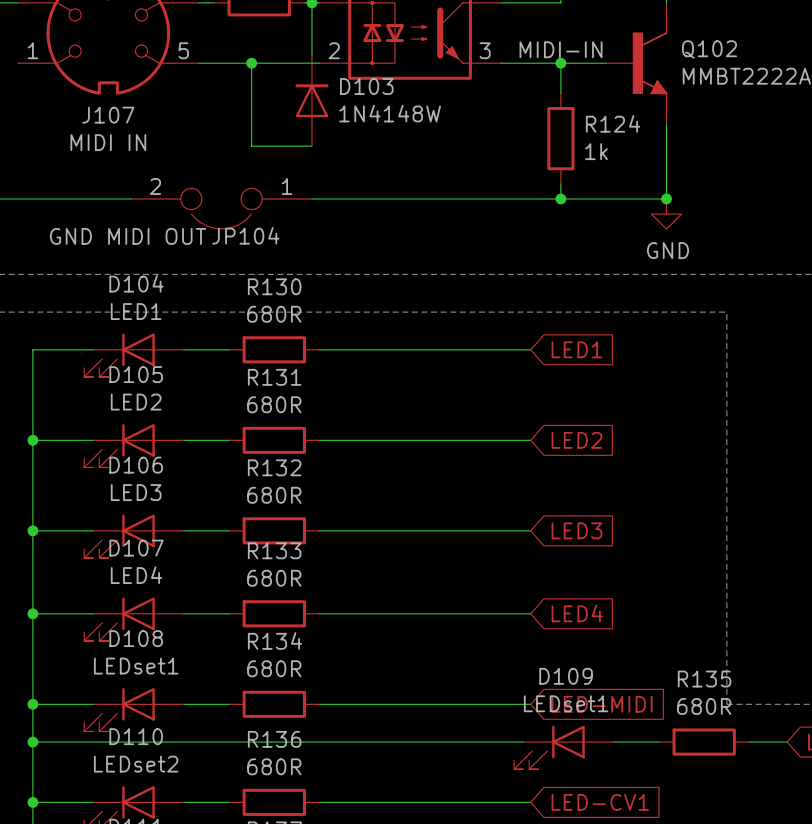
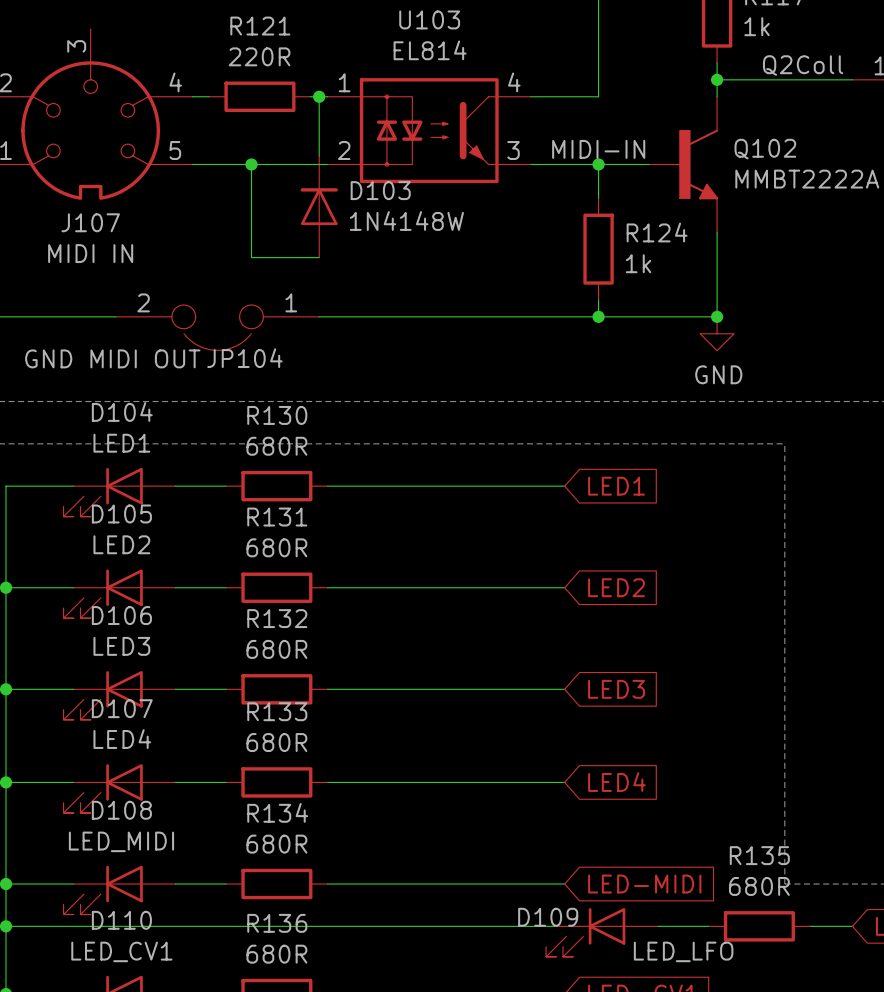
D108 value: LEDset1 (136, 666) -> LED_MIDI (121, 841)
D109 name position: D109 (566, 676) -> D109 (548, 917)
D109 value: LEDset1 (566, 703) -> LED_LFO (683, 951)
D110 value: LEDset2 (136, 764) -> LED_CV1 (121, 951)

